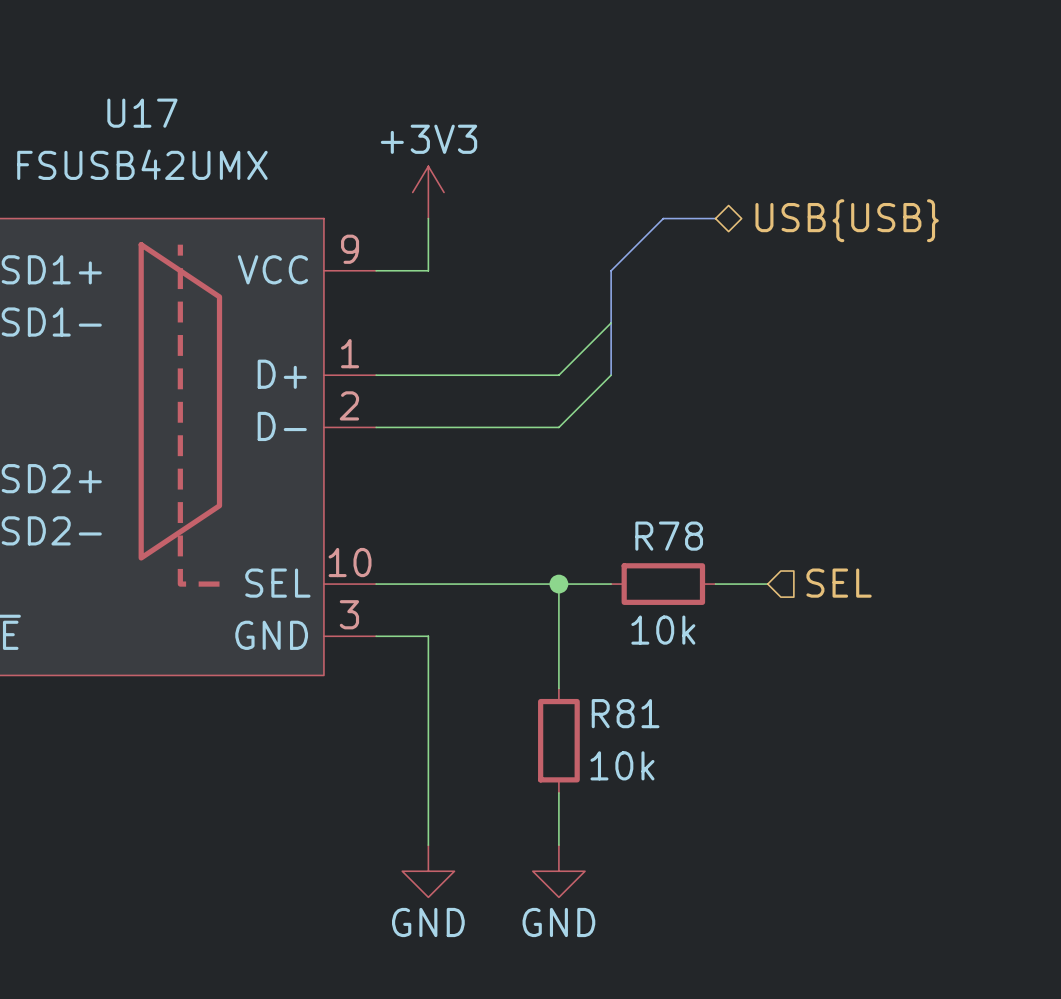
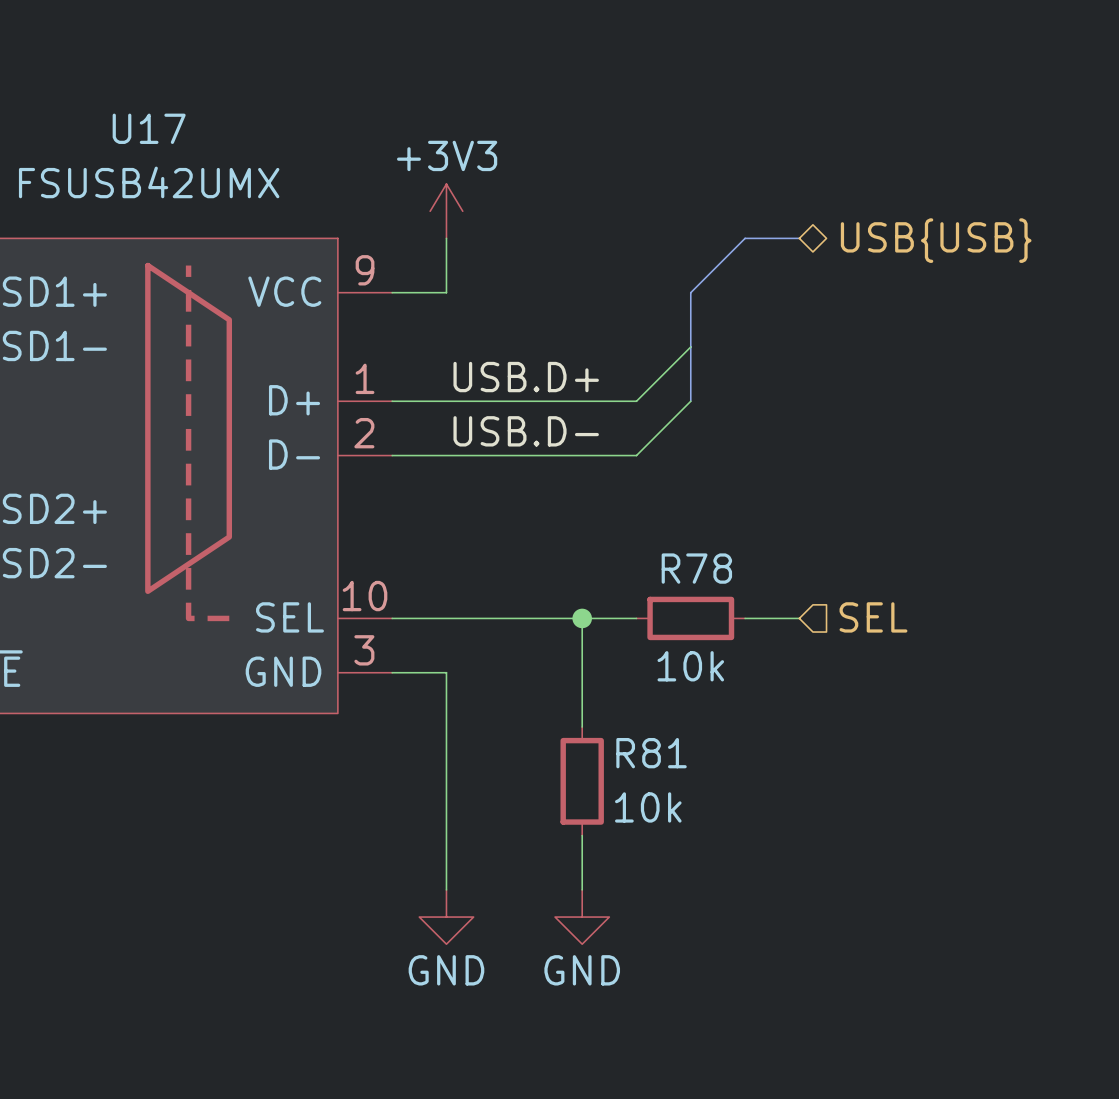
bus: (715, 218) (663, 218) (611, 270) (611, 375) -> (799, 238) (745, 238) (690, 292) (690, 401)
hierarchical label position: USB{USB} (847, 220) -> USB{USB} (936, 240)
wire: (611, 322) (558, 375) -> (690, 346) (636, 401) (582, 401)
label: none -> USB.D+ (526, 377)
wire: (611, 375) (558, 427) -> (690, 401) (636, 455) (582, 455)
label: none -> USB.D- (526, 431)

